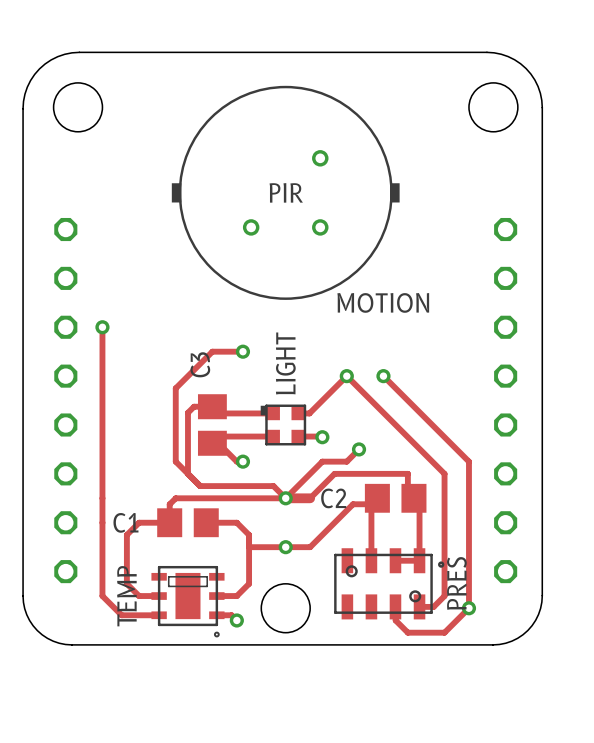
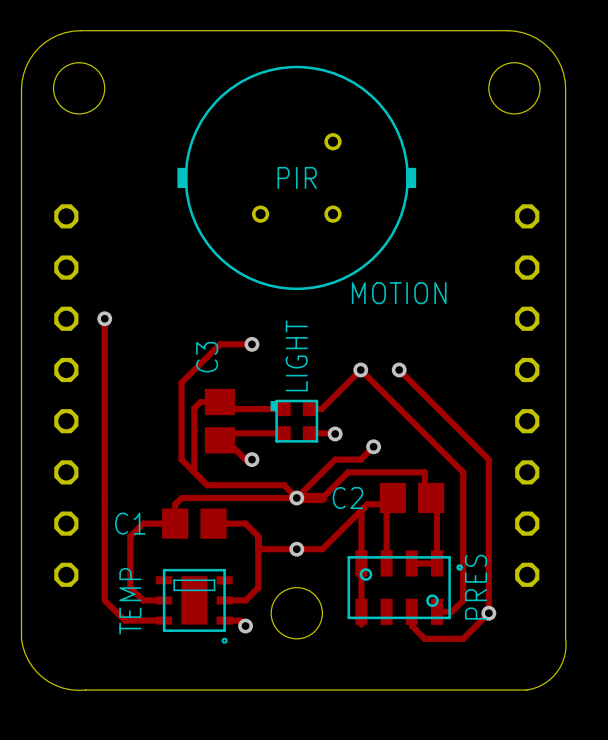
track: none -> (361, 510) (361, 624)
board edge: (542, 595) (538, 614) (527, 630) (511, 641) (493, 644) (65, 644) (53, 641) (37, 630) (26, 614) (23, 596) -> (565, 600) (566, 644) (562, 661) (556, 672) (548, 680) (538, 686) (526, 690) (77, 690) (62, 688) (49, 682) (37, 672) (28, 660) (21, 638) (21, 600)

